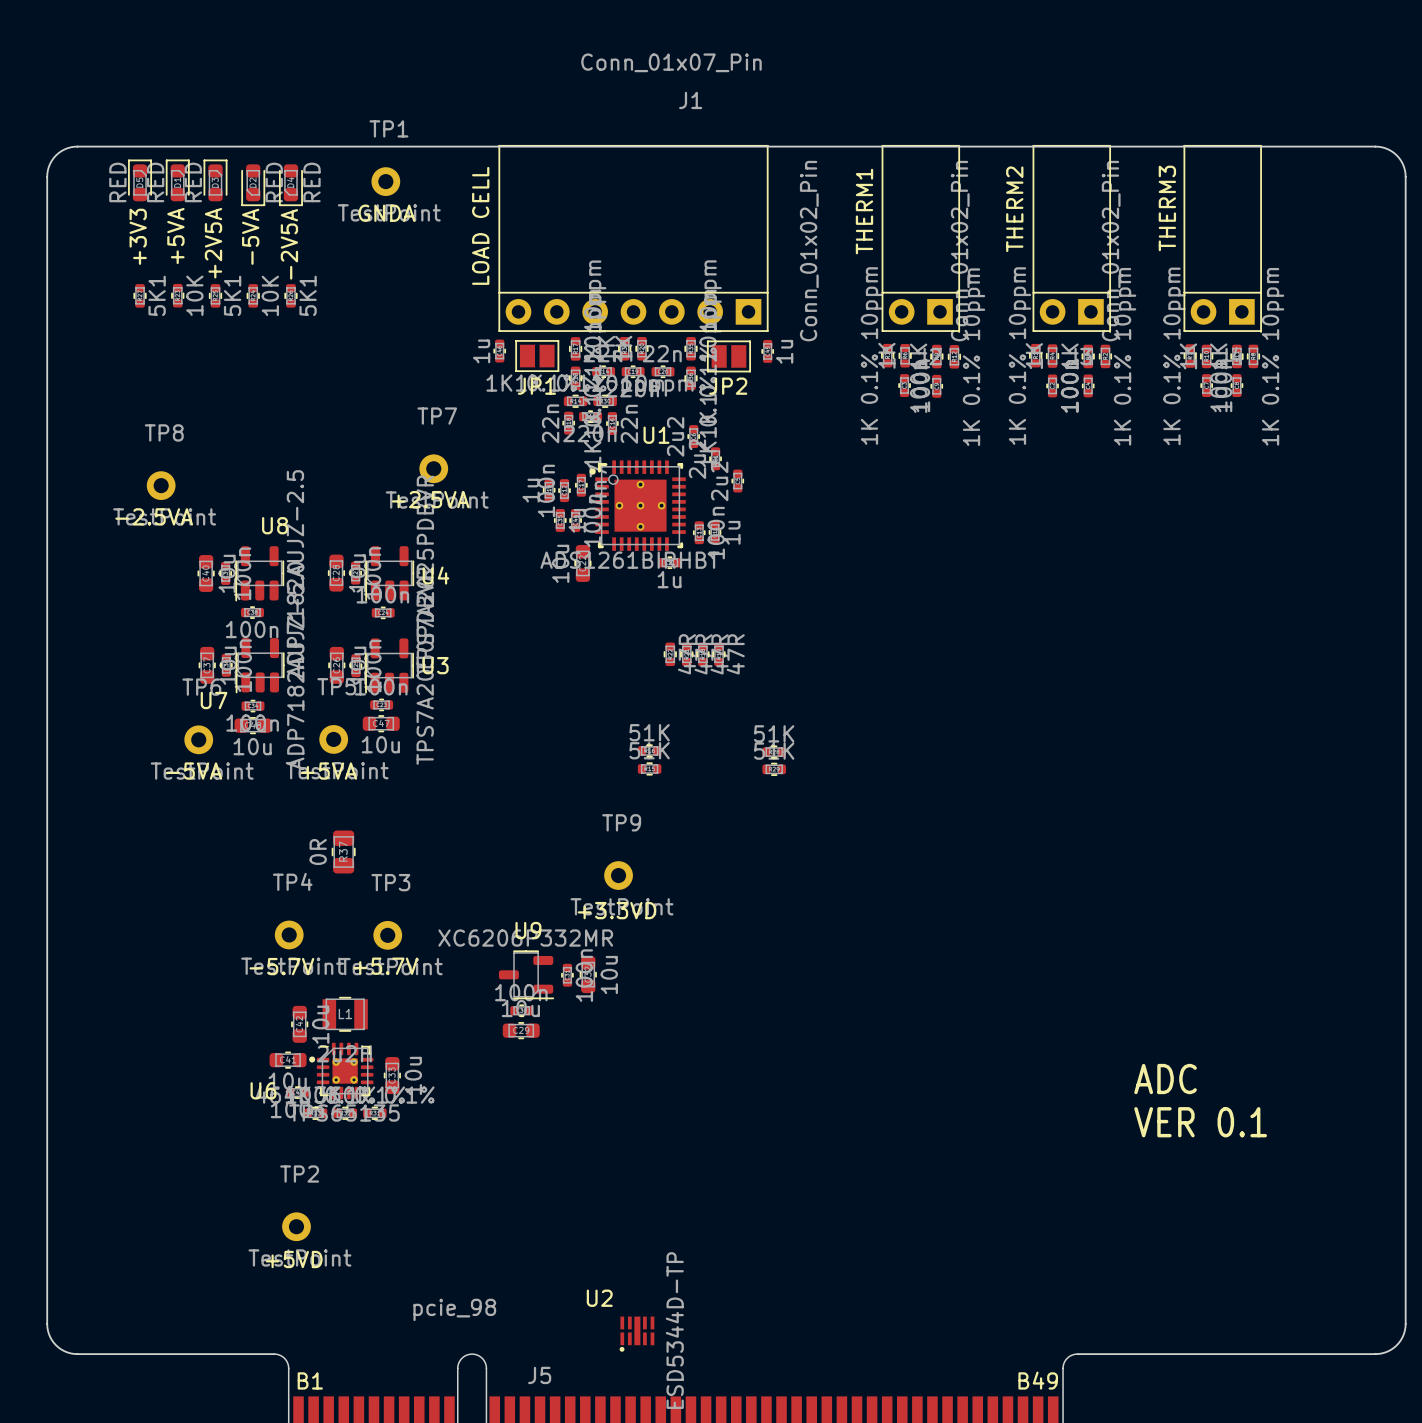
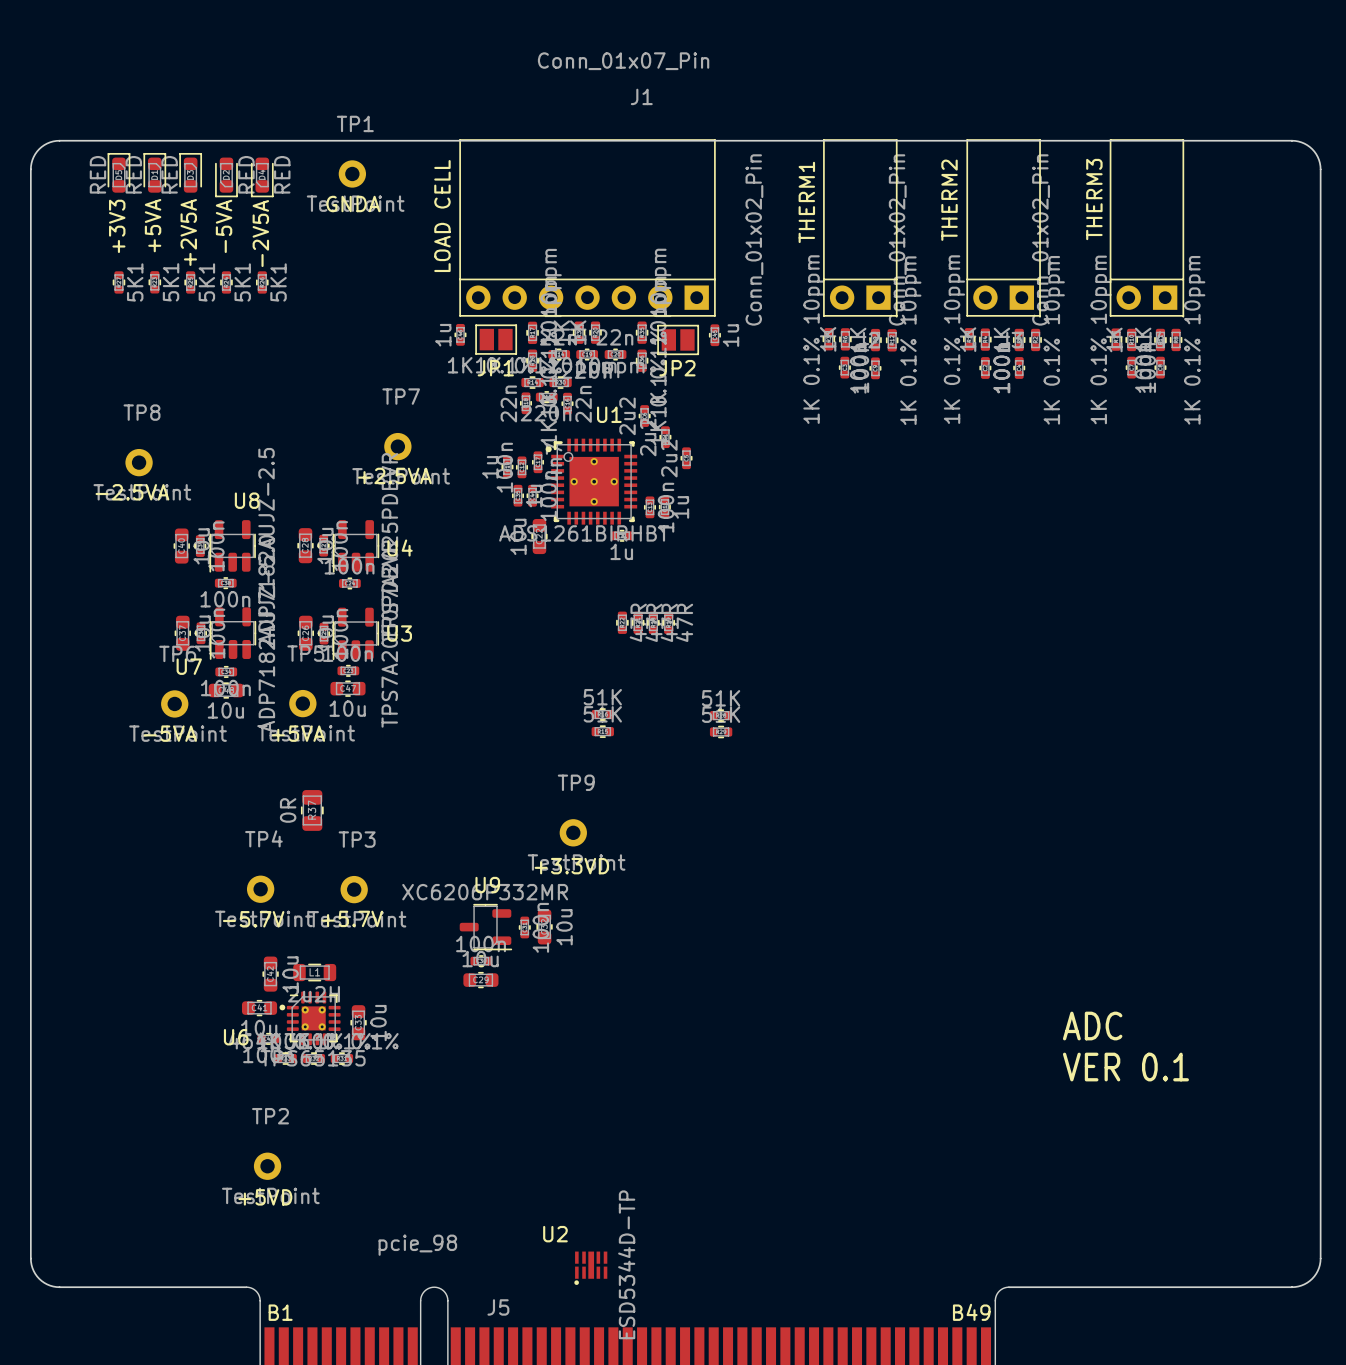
part value: 10K (194, 295) -> 5K1 (171, 282)
part value: 10K (270, 295) -> 5K1 (242, 282)
L1 footprint: [322, 996, 368, 1032] -> [293, 963, 337, 982]

